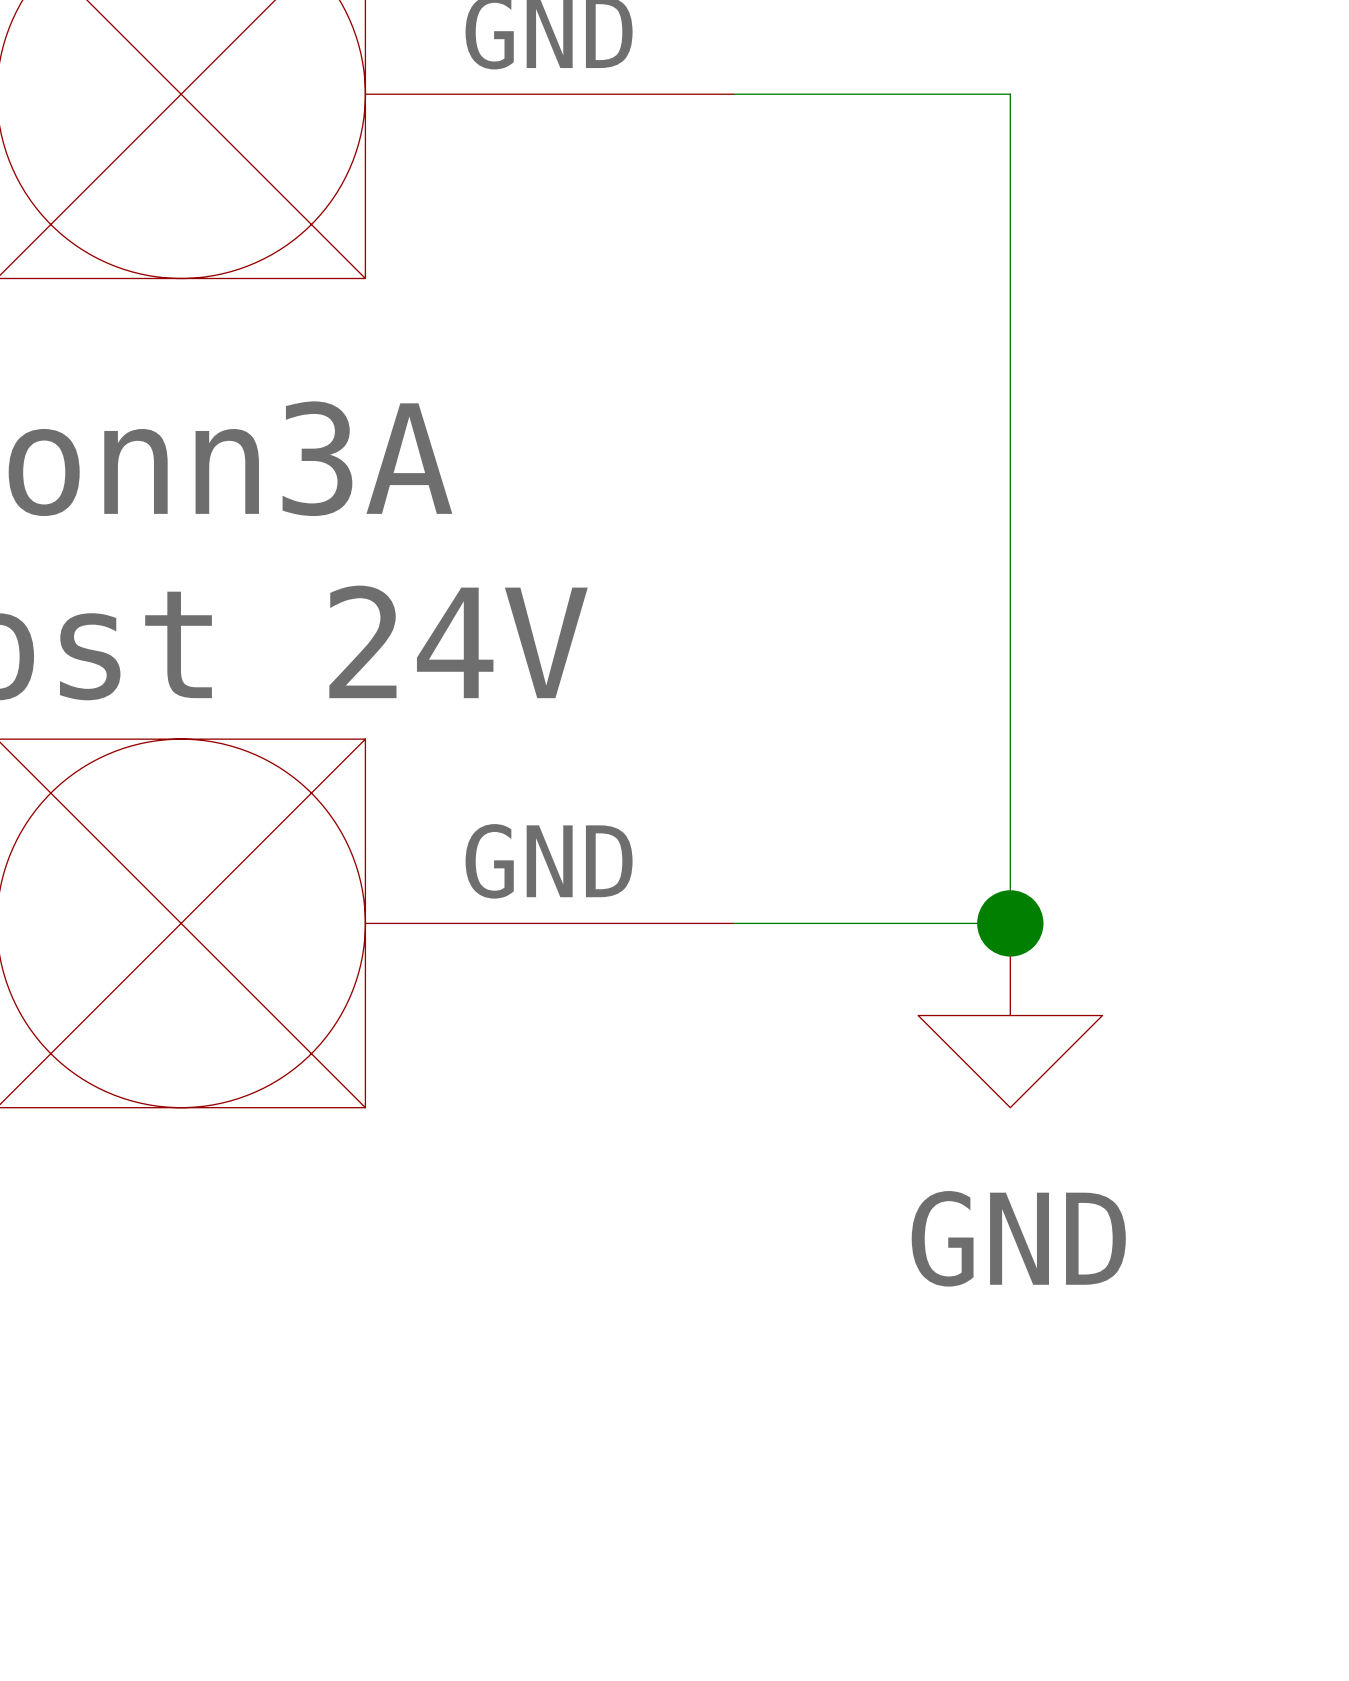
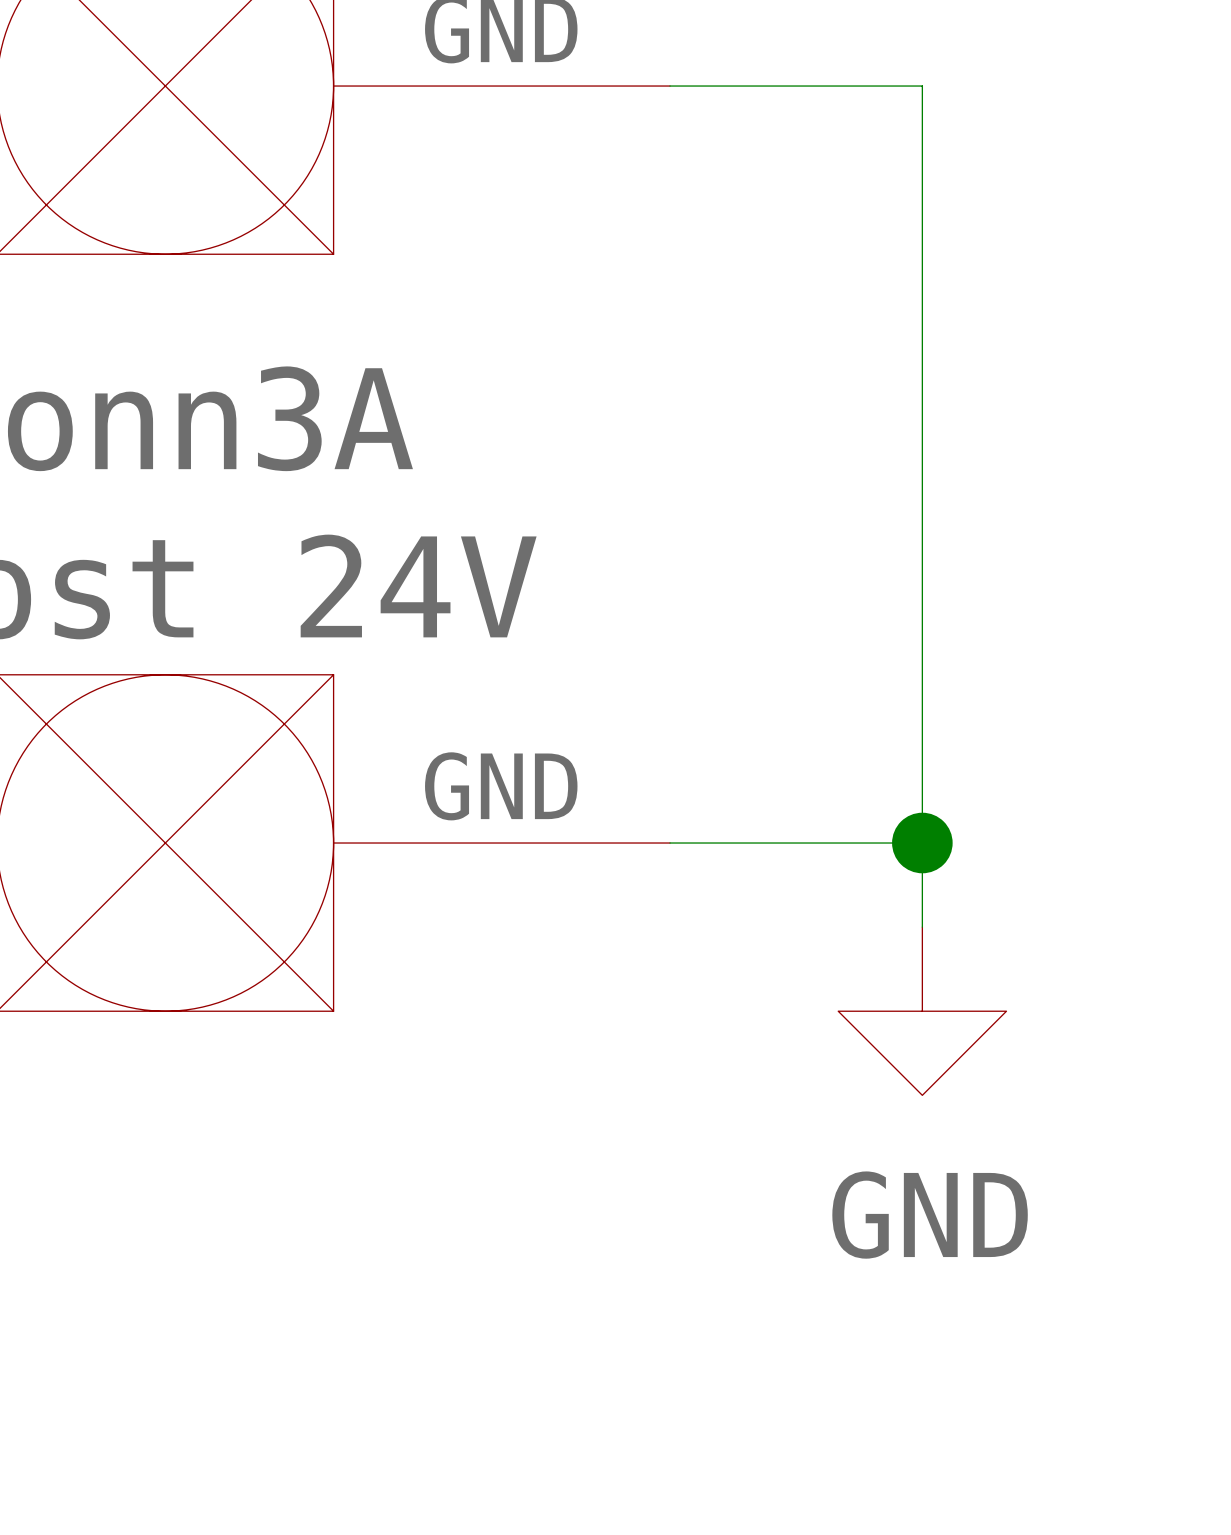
power symbol position: GND (1010, 1015) -> GND (922, 1011)

